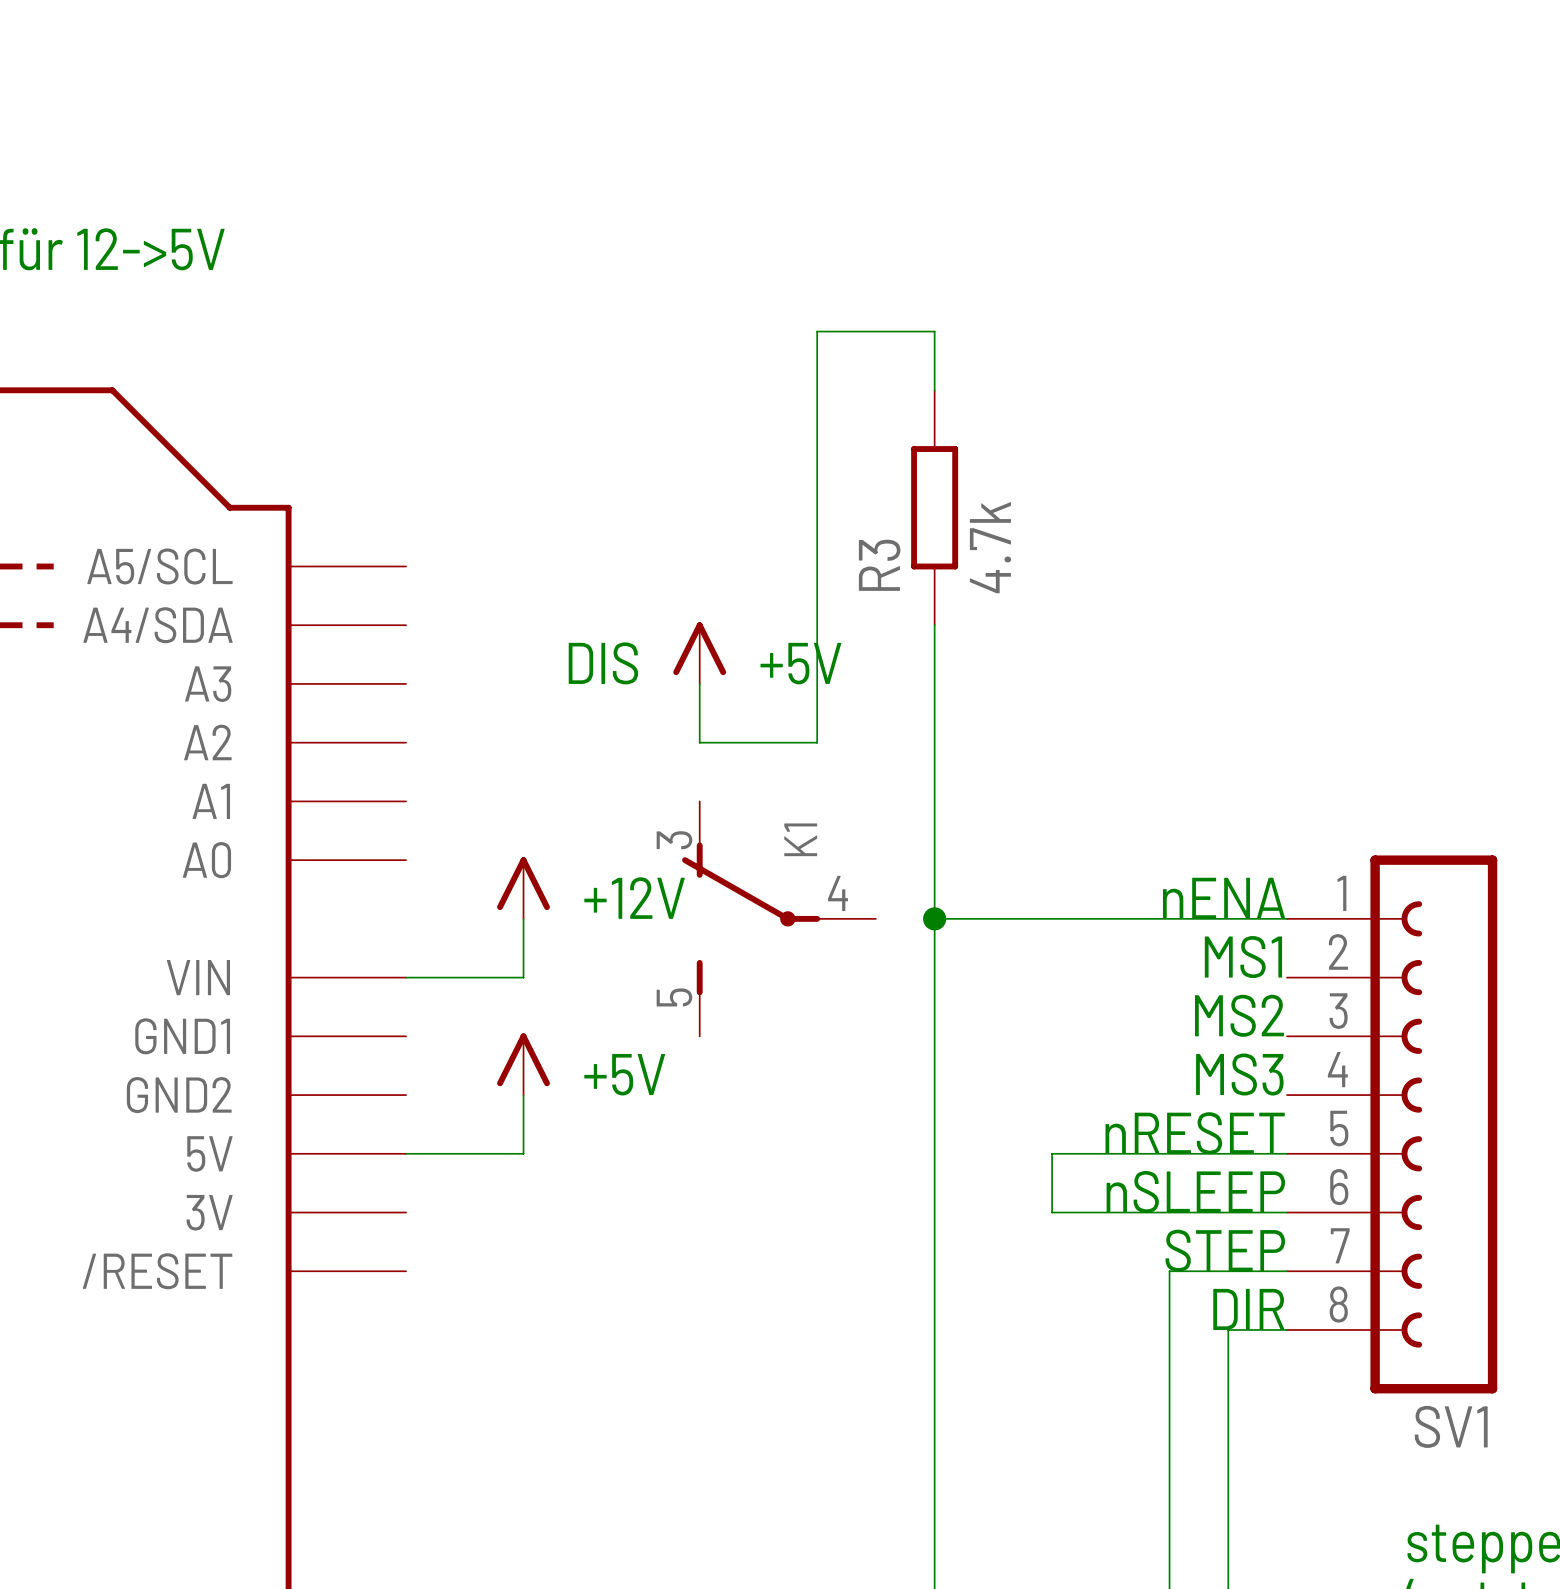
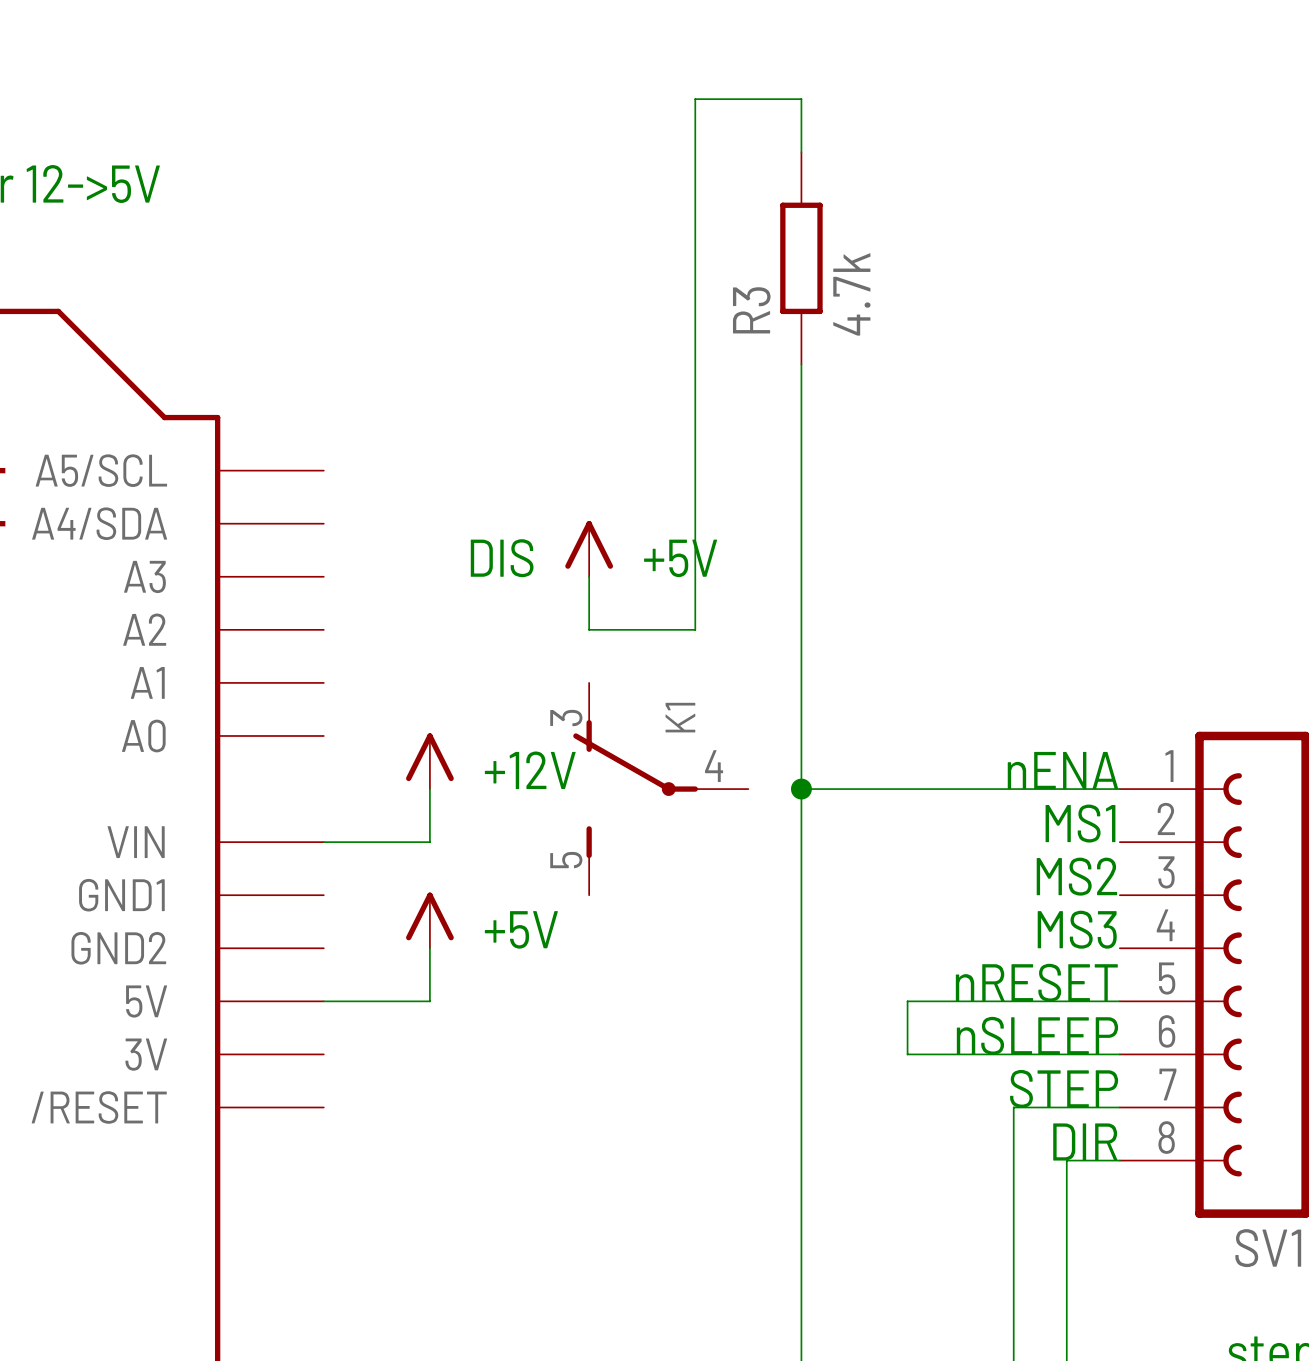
wire: (817, 331) (934, 331) (934, 390) -> (695, 258) (695, 99) (801, 99) (801, 152)
wire: none -> (801, 364) (801, 523)
R3 position: (934, 507) -> (801, 258)

